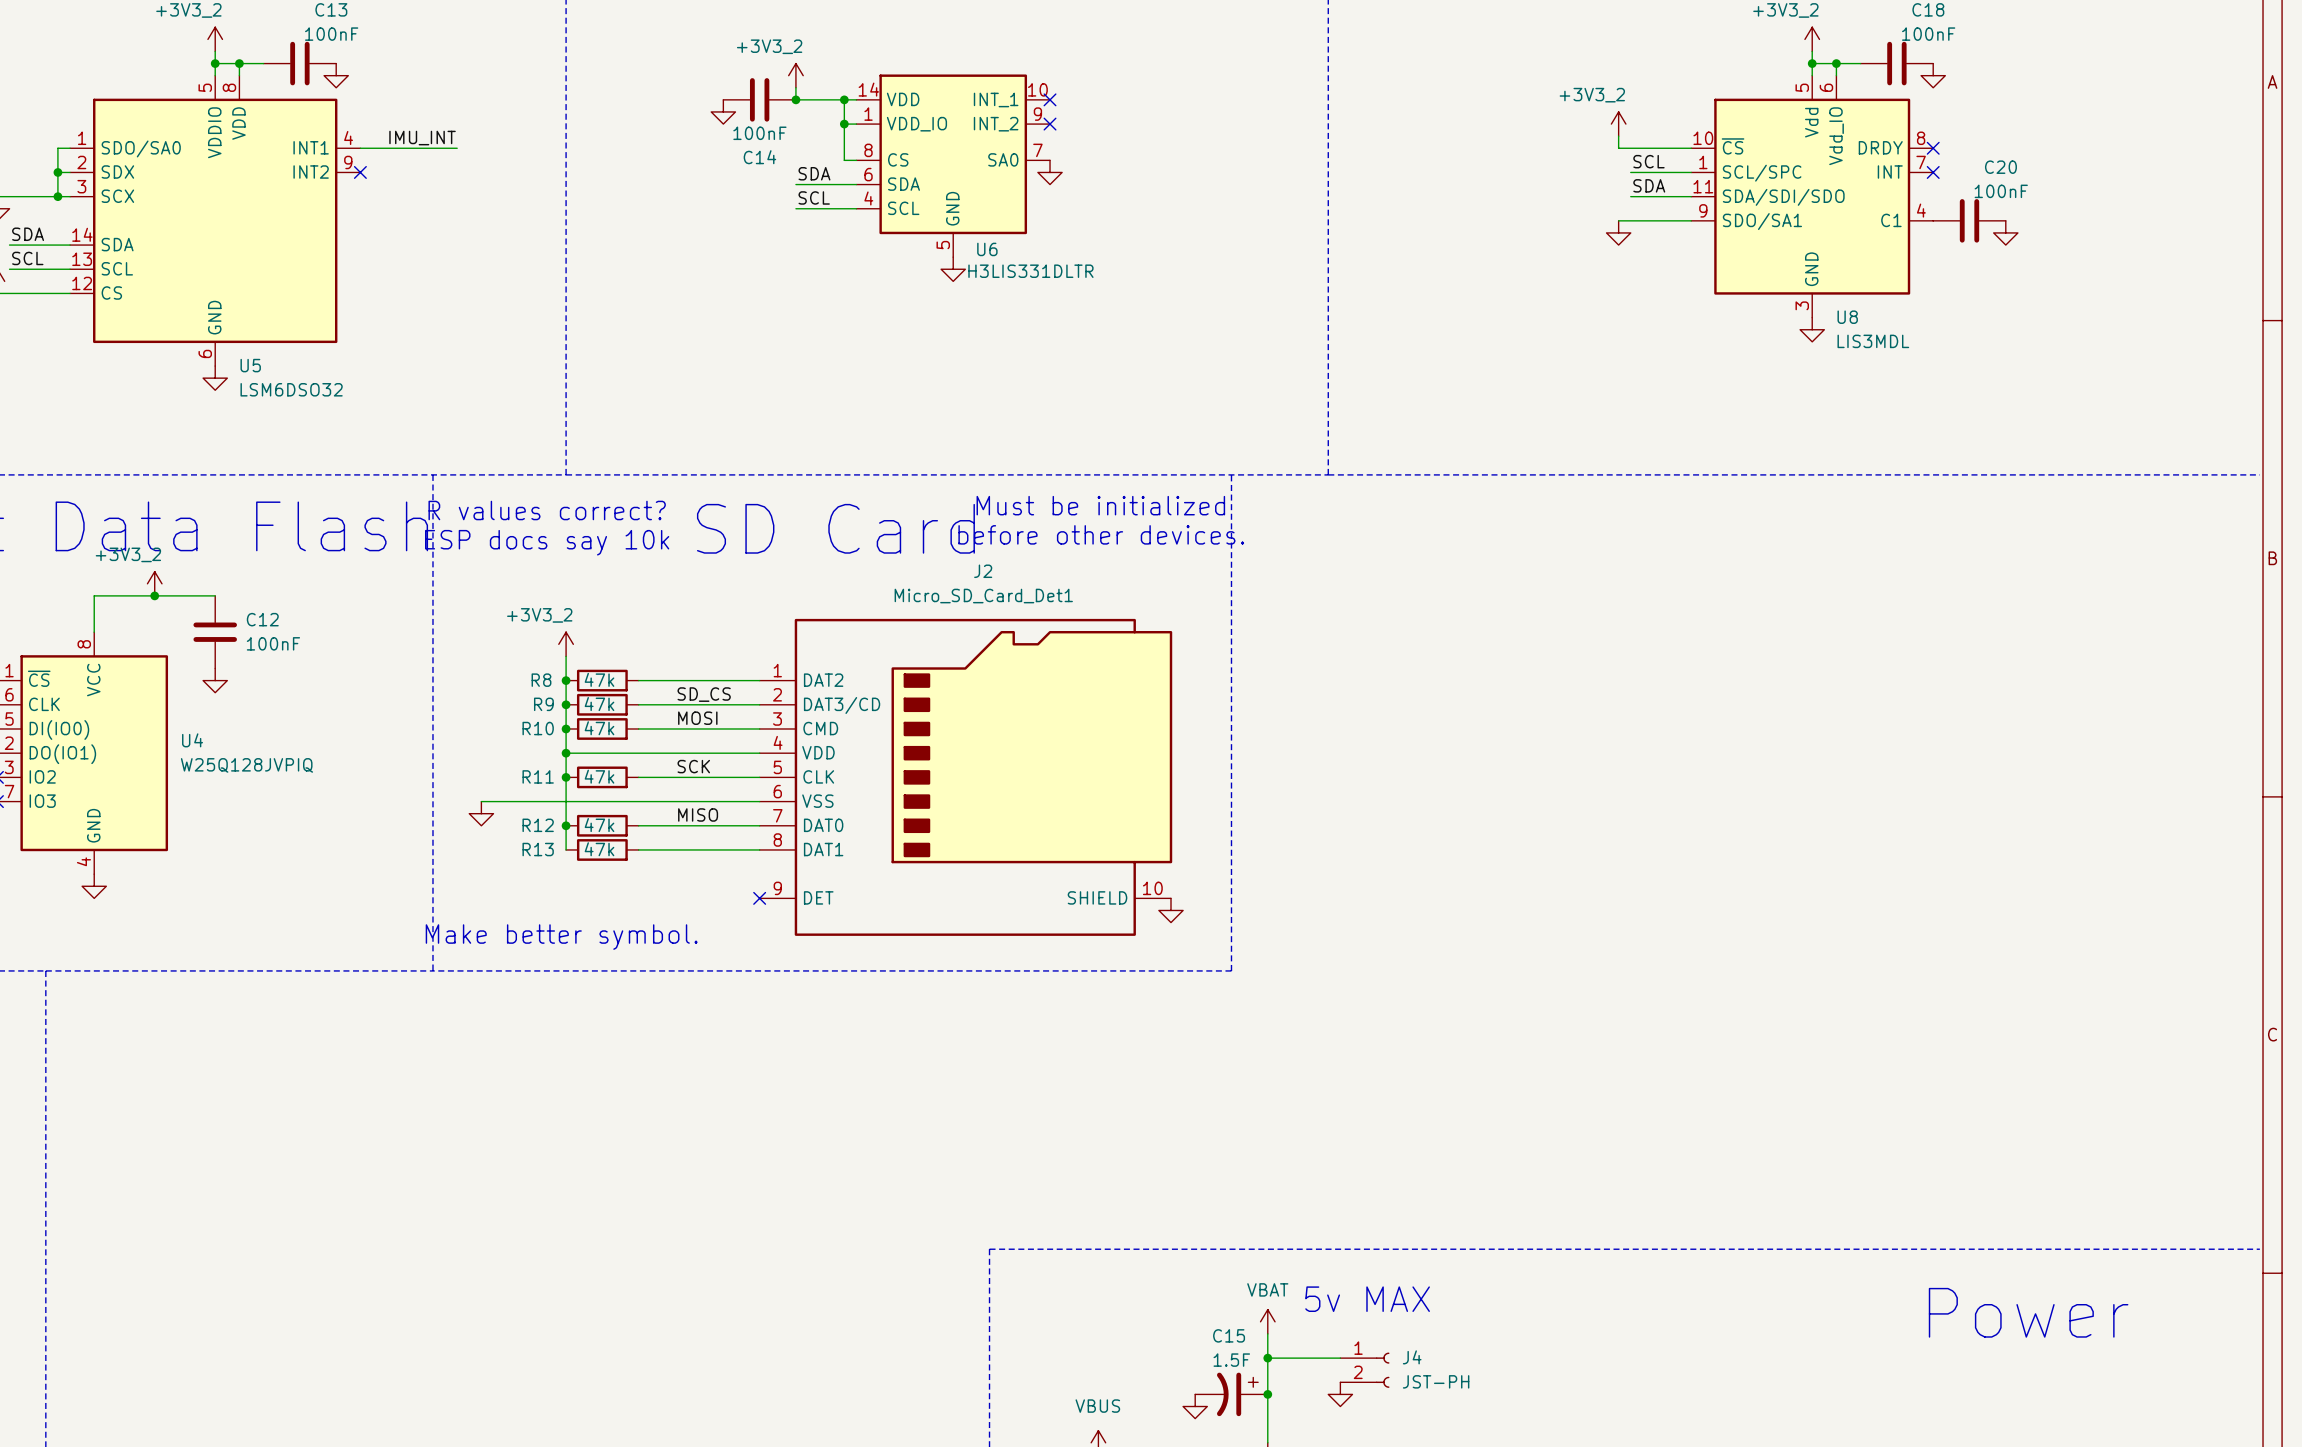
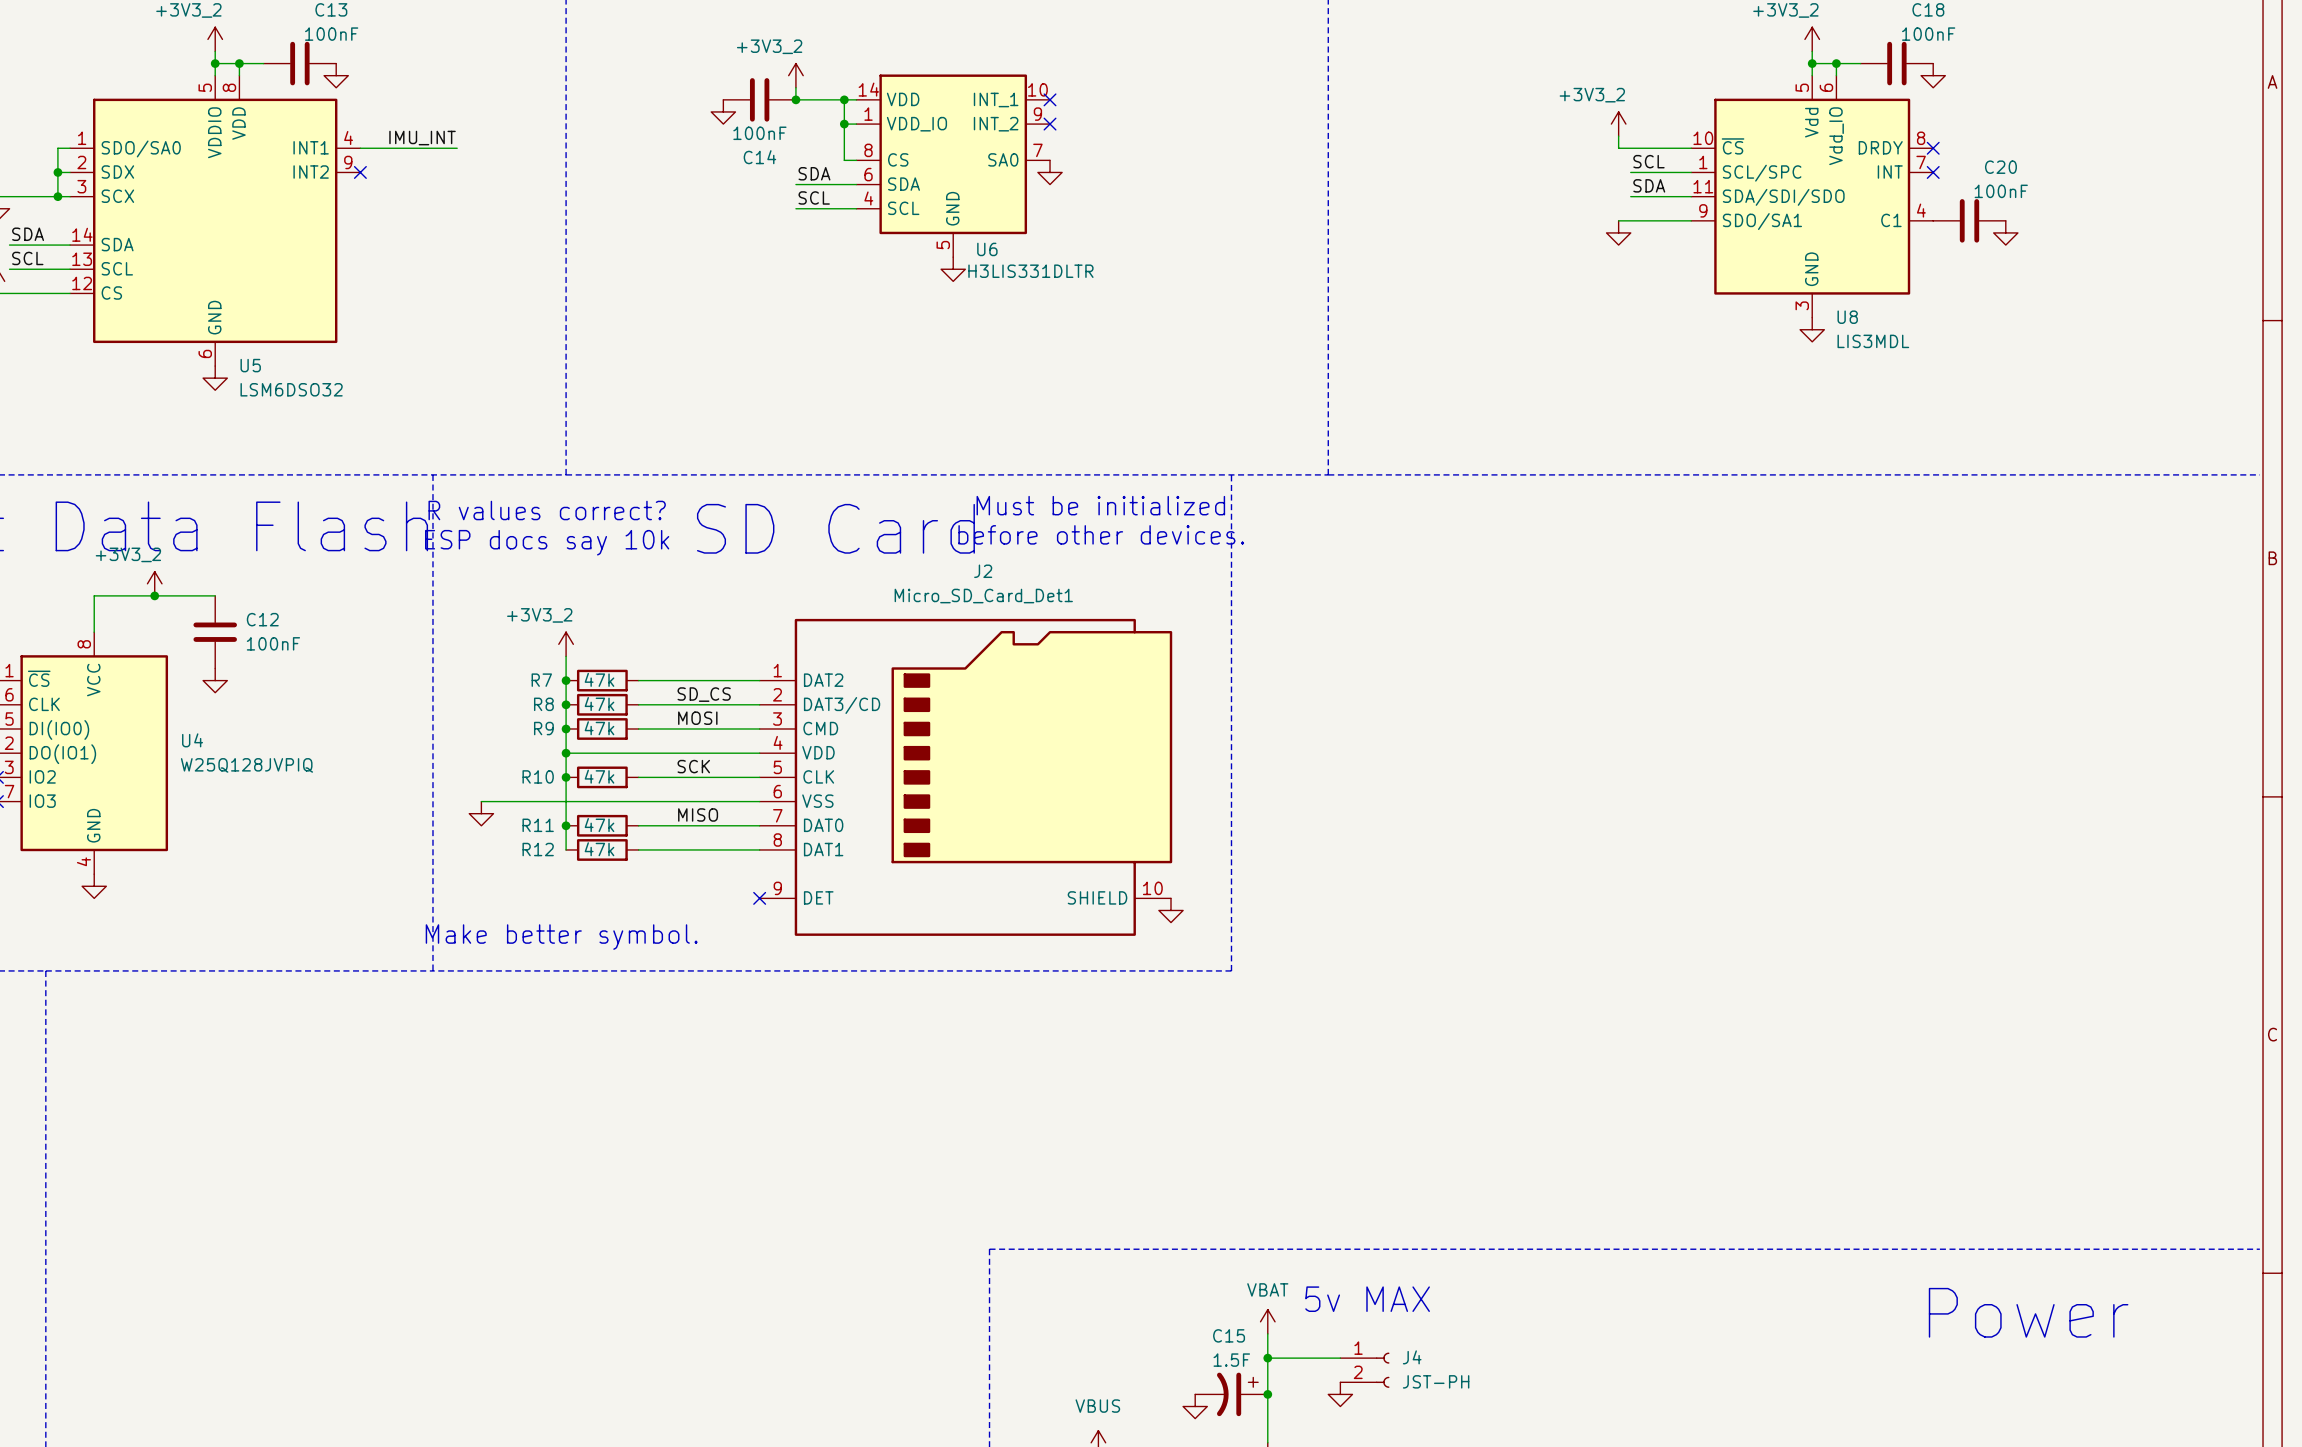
R8 name: R8 (541, 680) -> R7 (541, 680)
R9 name: R9 (543, 704) -> R8 (543, 704)
R10 name: R10 (538, 728) -> R9 (543, 728)
R11 name: R11 (538, 776) -> R10 (538, 776)
R12 name: R12 (538, 825) -> R11 (538, 825)
R13 name: R13 (538, 849) -> R12 (538, 849)

